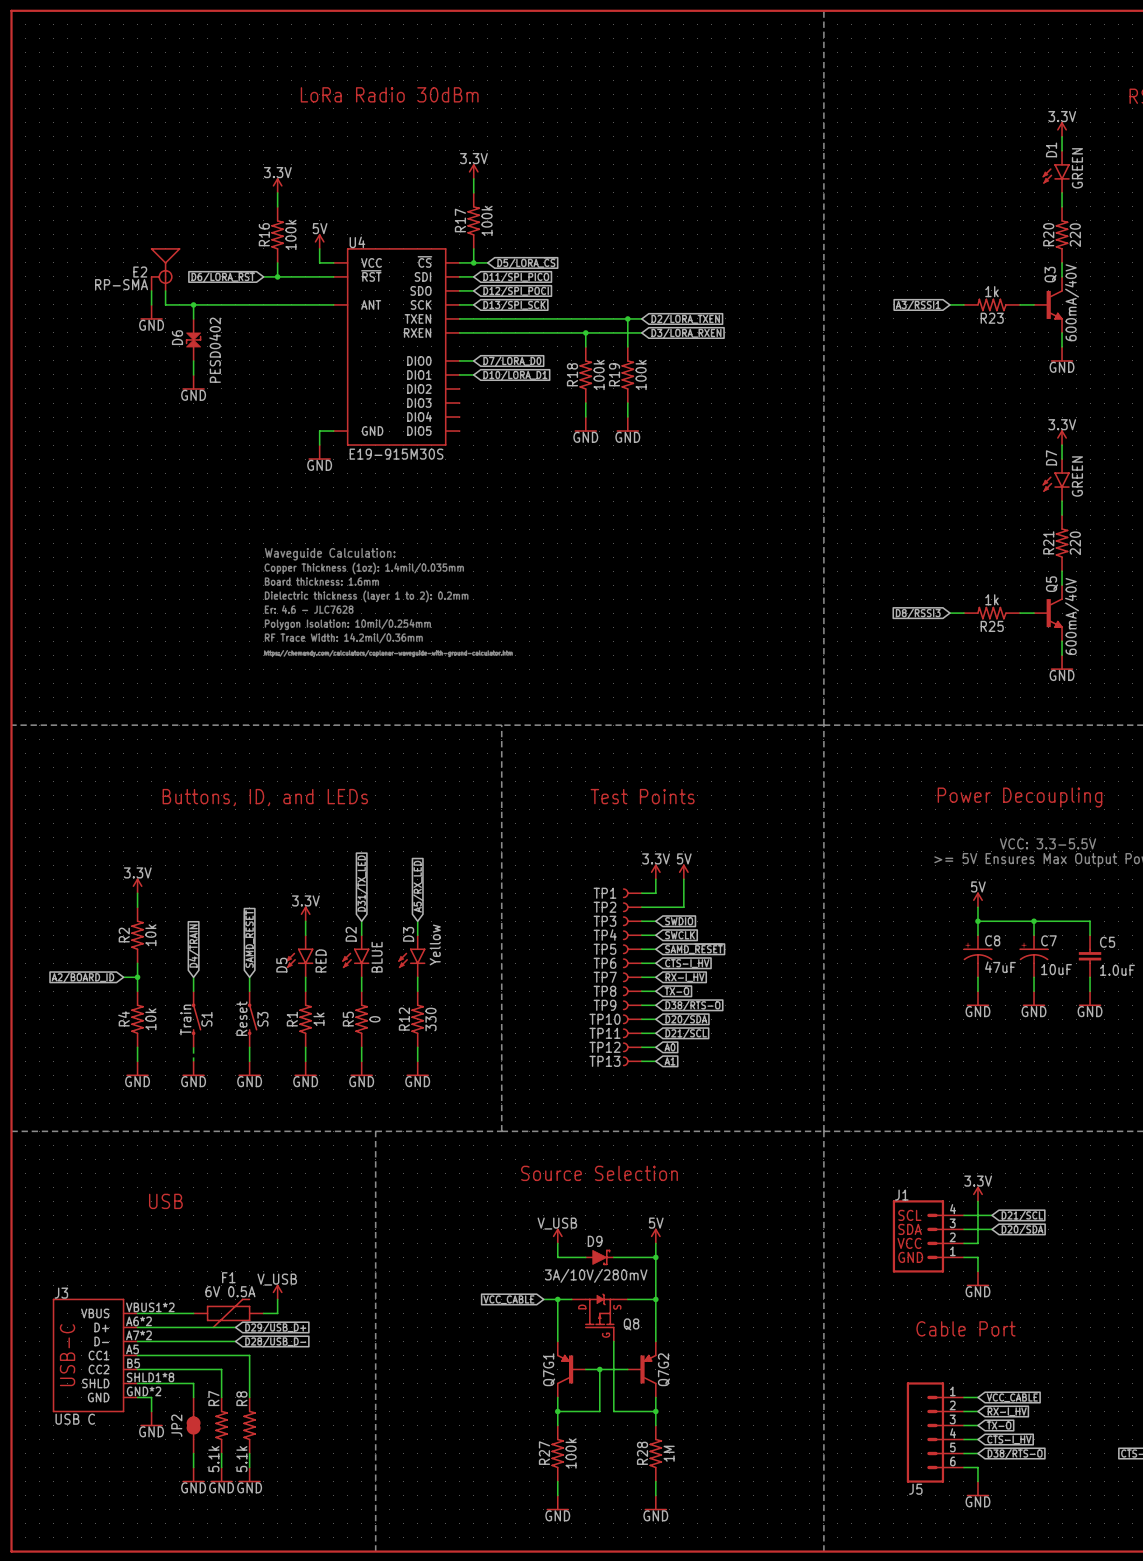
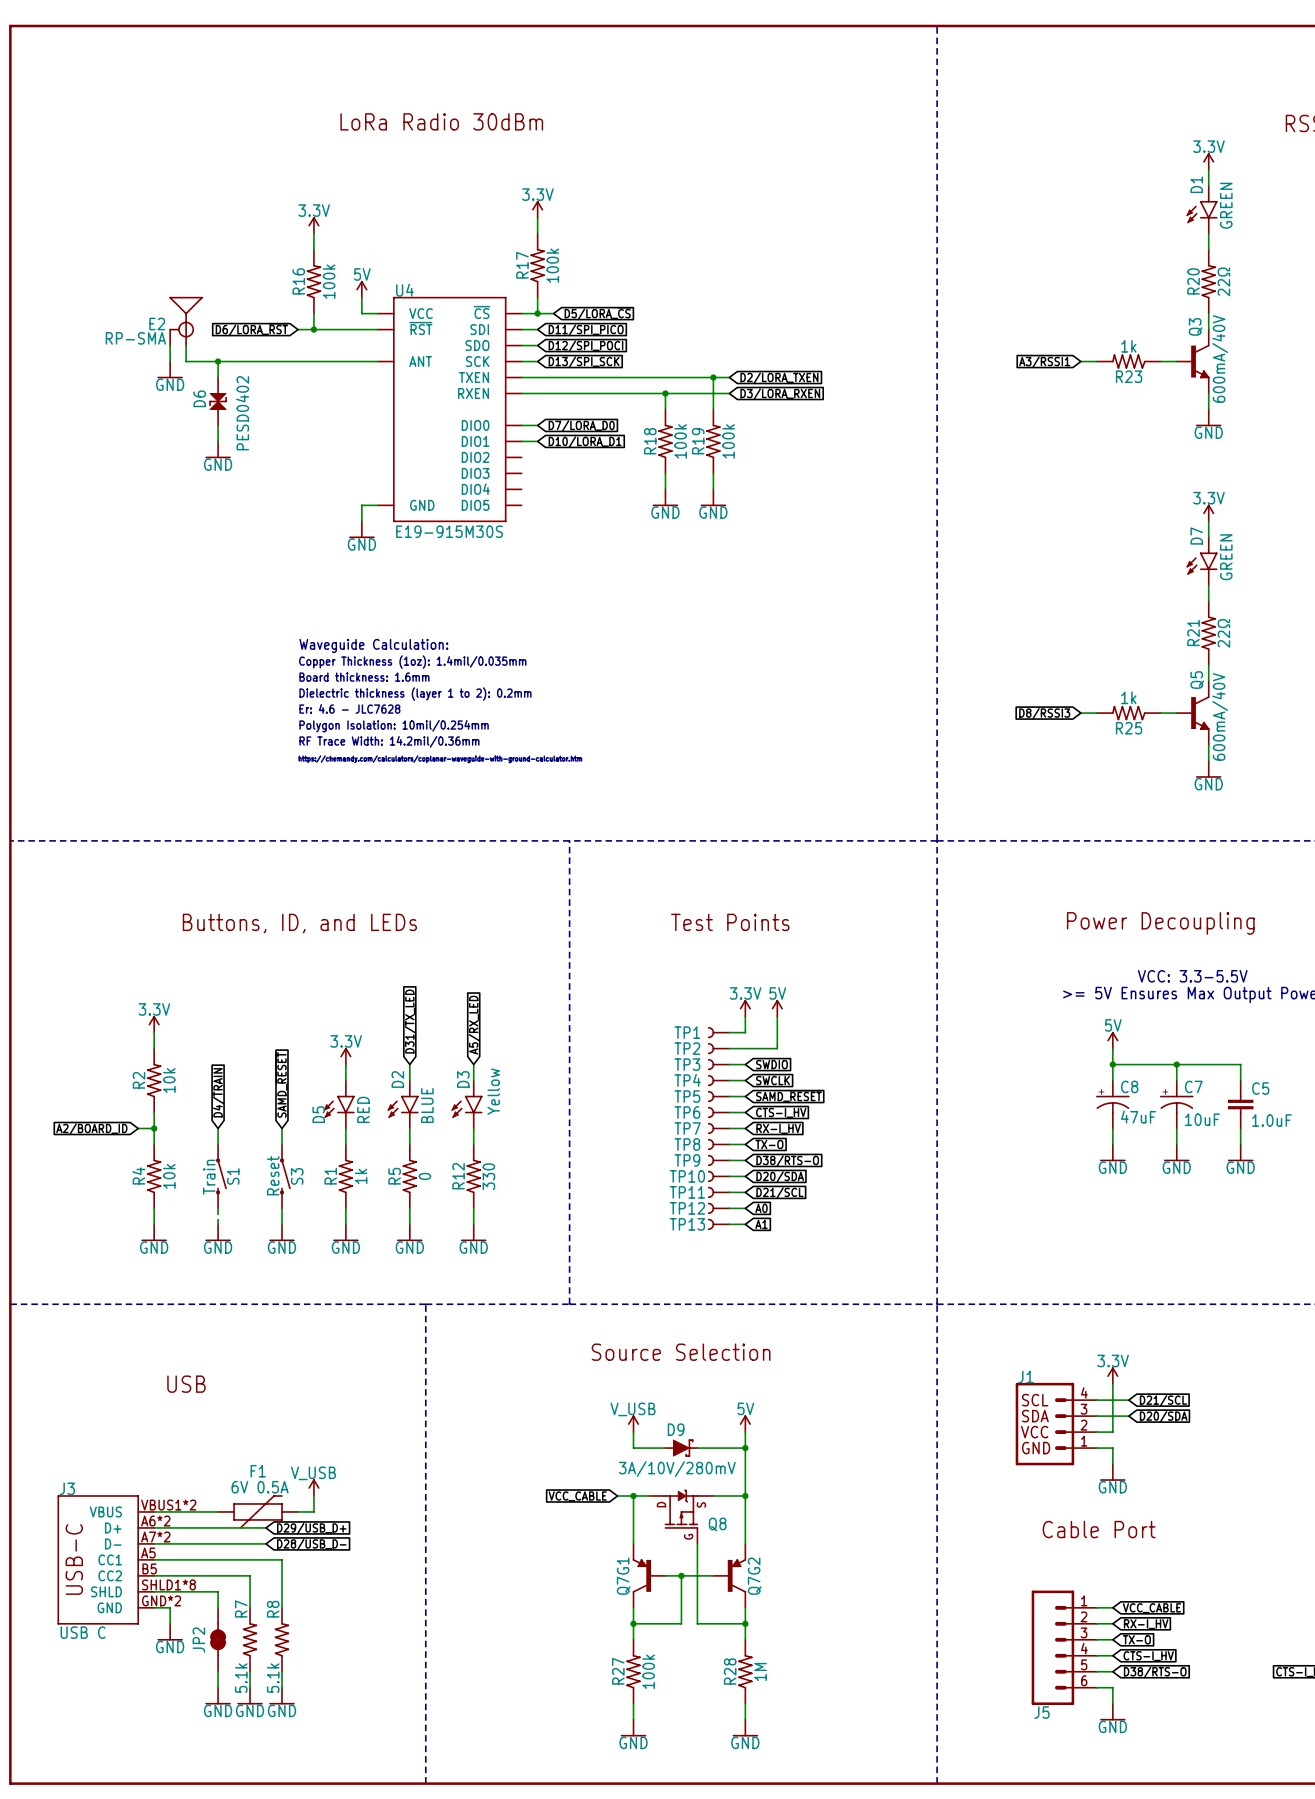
R20 value: 220 (1075, 235) -> 22Ω (1223, 281)
R21 value: 220 (1075, 543) -> 22Ω (1223, 633)

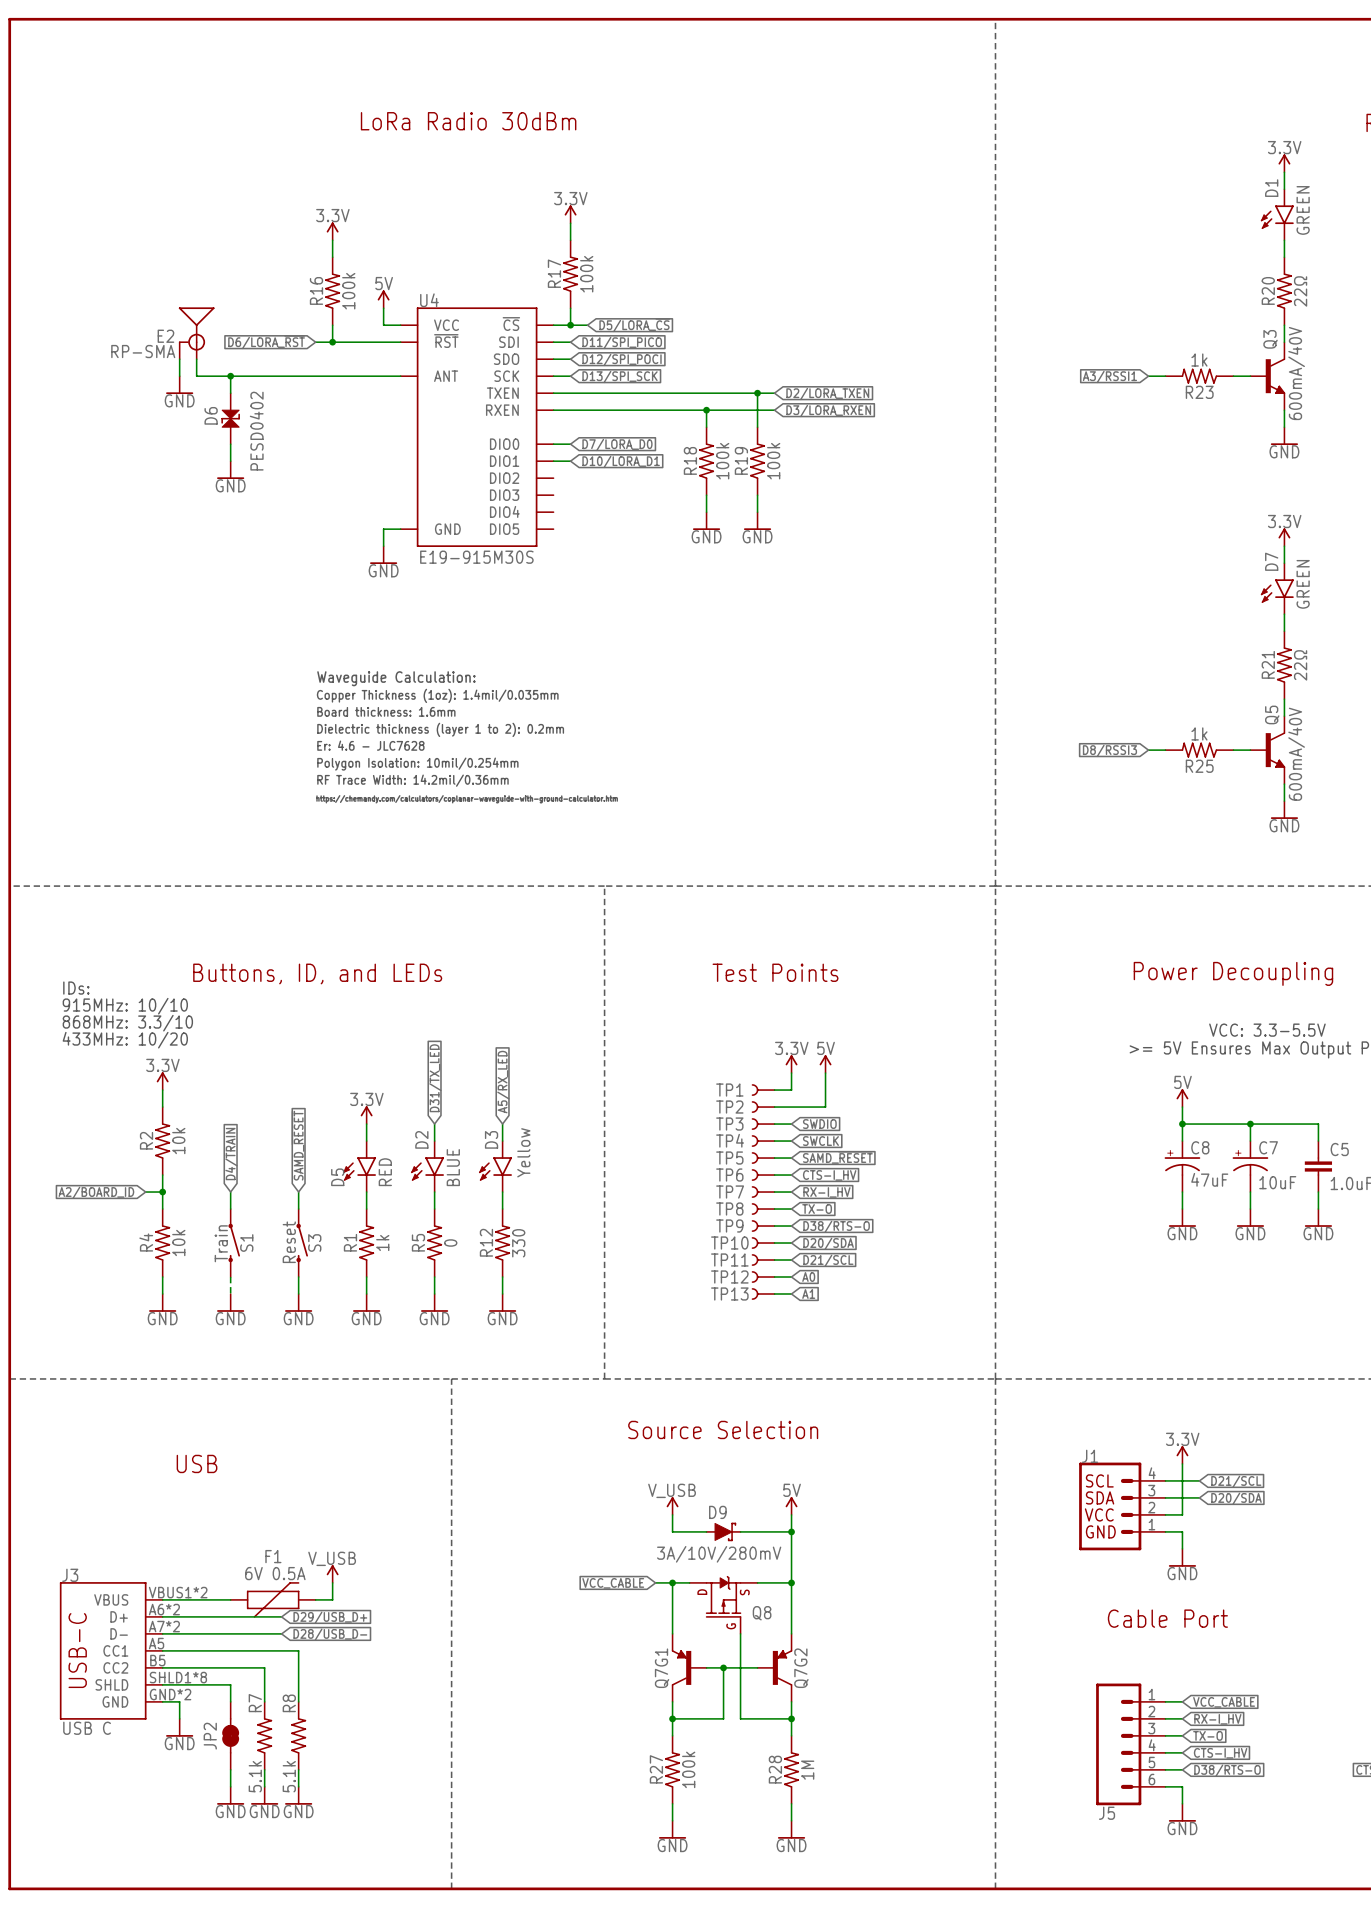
text: none -> IDs: (76, 988)
text: none -> 915MHz: 10/10 (125, 1006)
text: none -> 868MHz: 3.3/10 (127, 1023)
text: none -> 433MHz: 10/20 (125, 1040)

